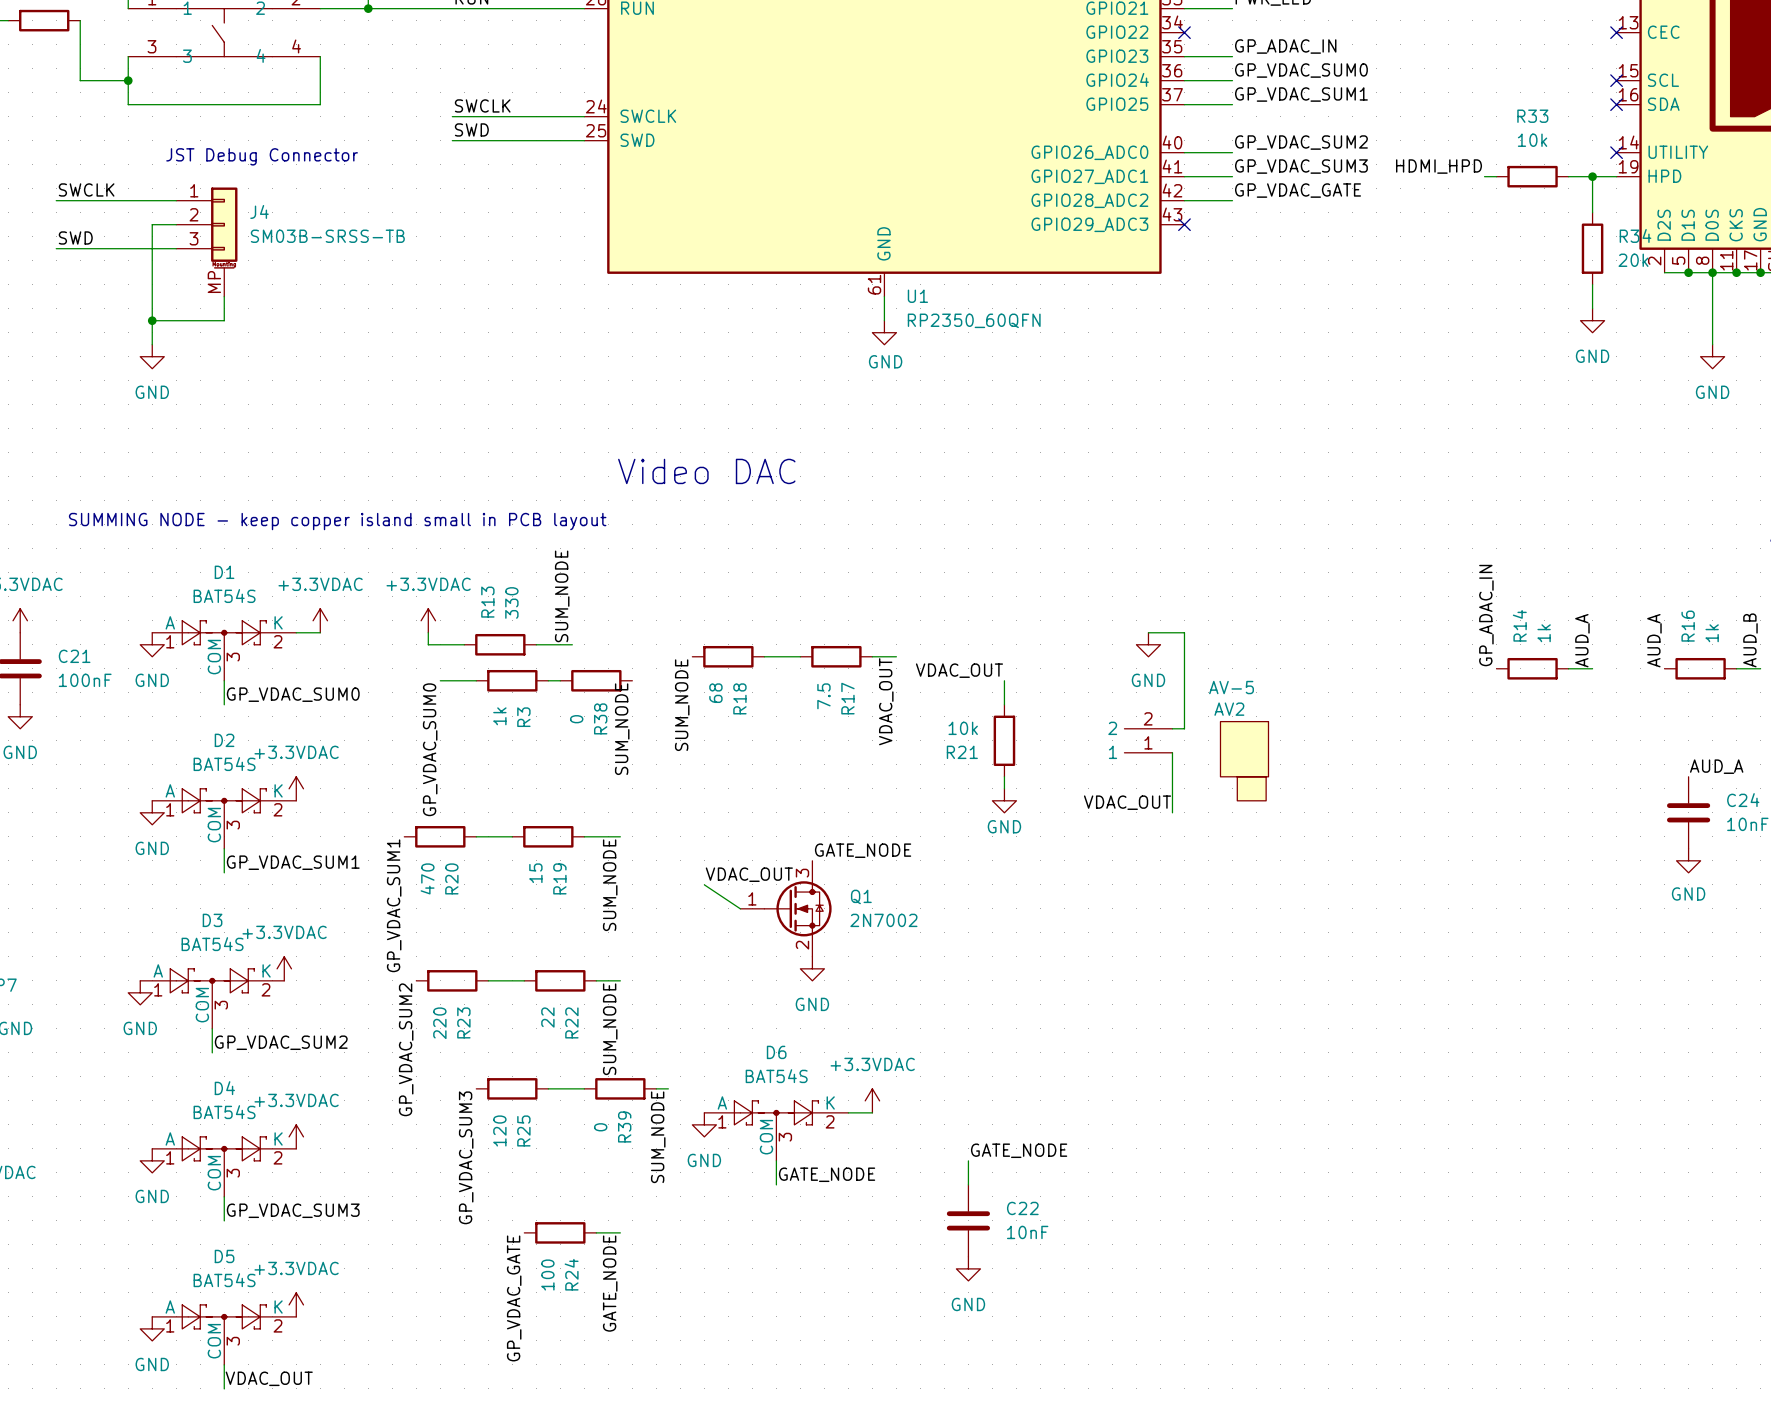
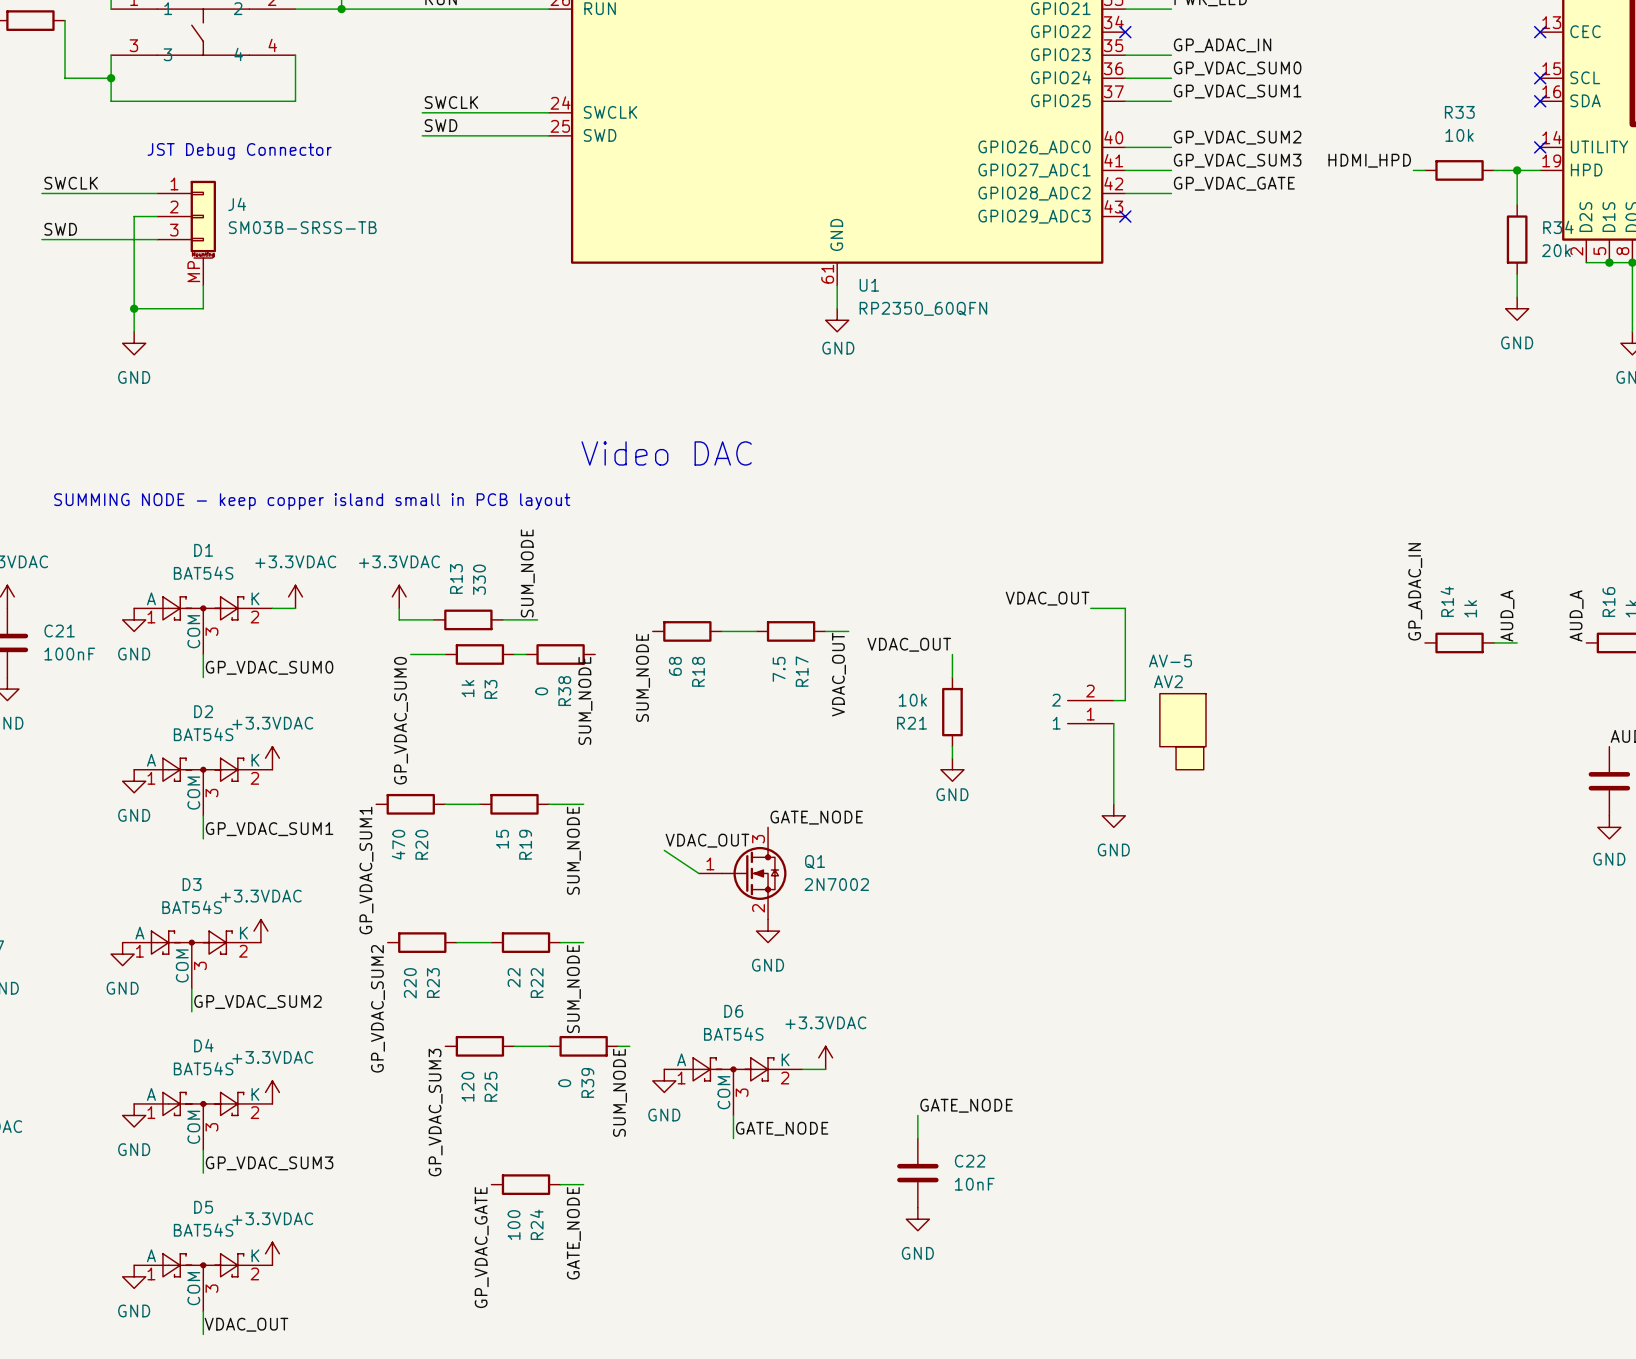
power symbol position: GND (1148, 644) -> GND (1113, 815)
label position: VDAC_OUT (1127, 802) -> VDAC_OUT (1047, 598)
wire: none -> (1113, 781) (1113, 804)

